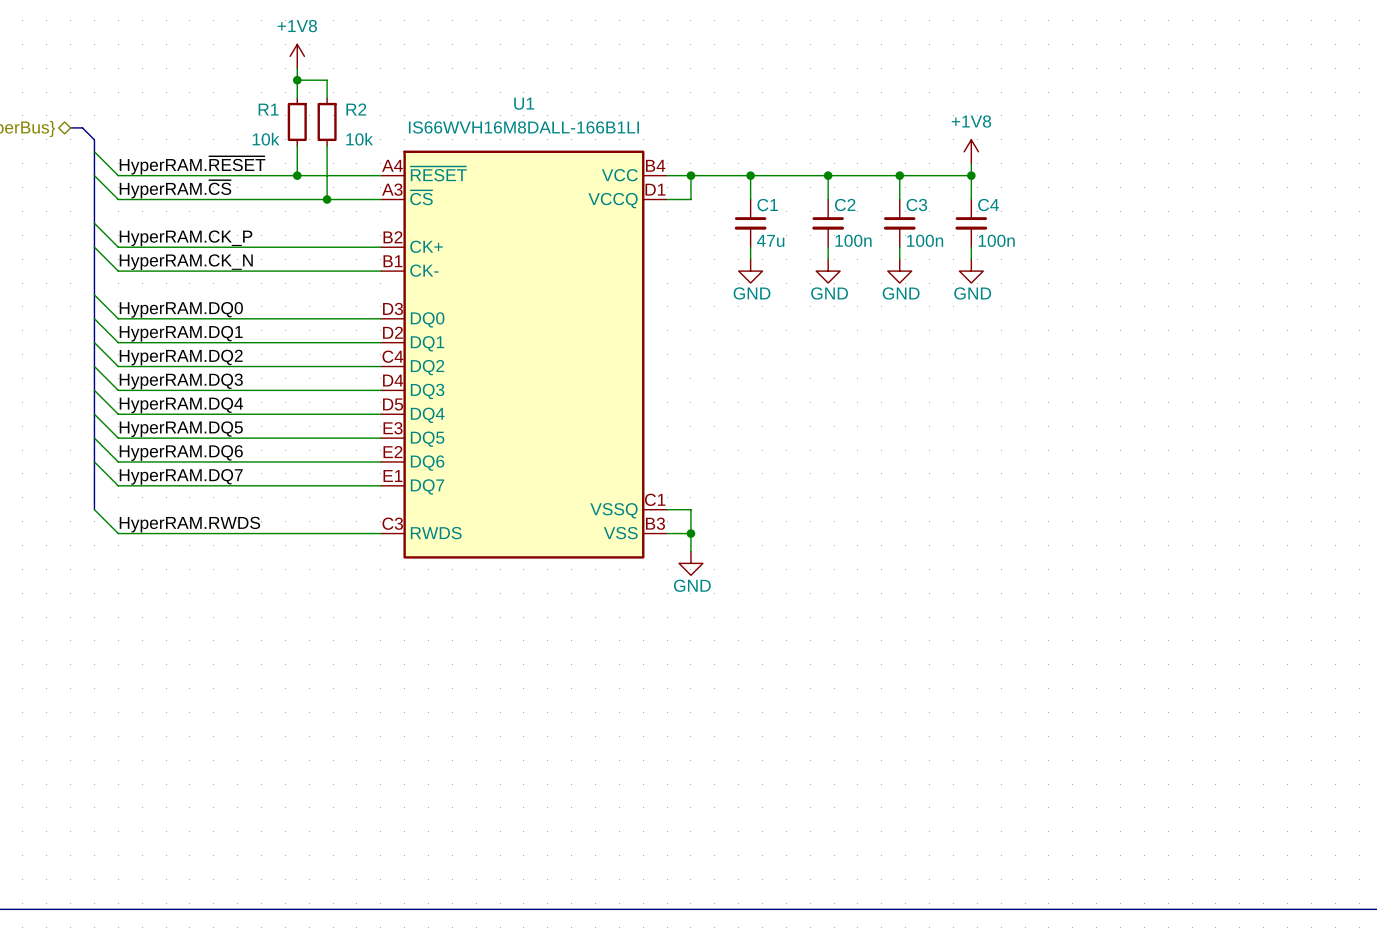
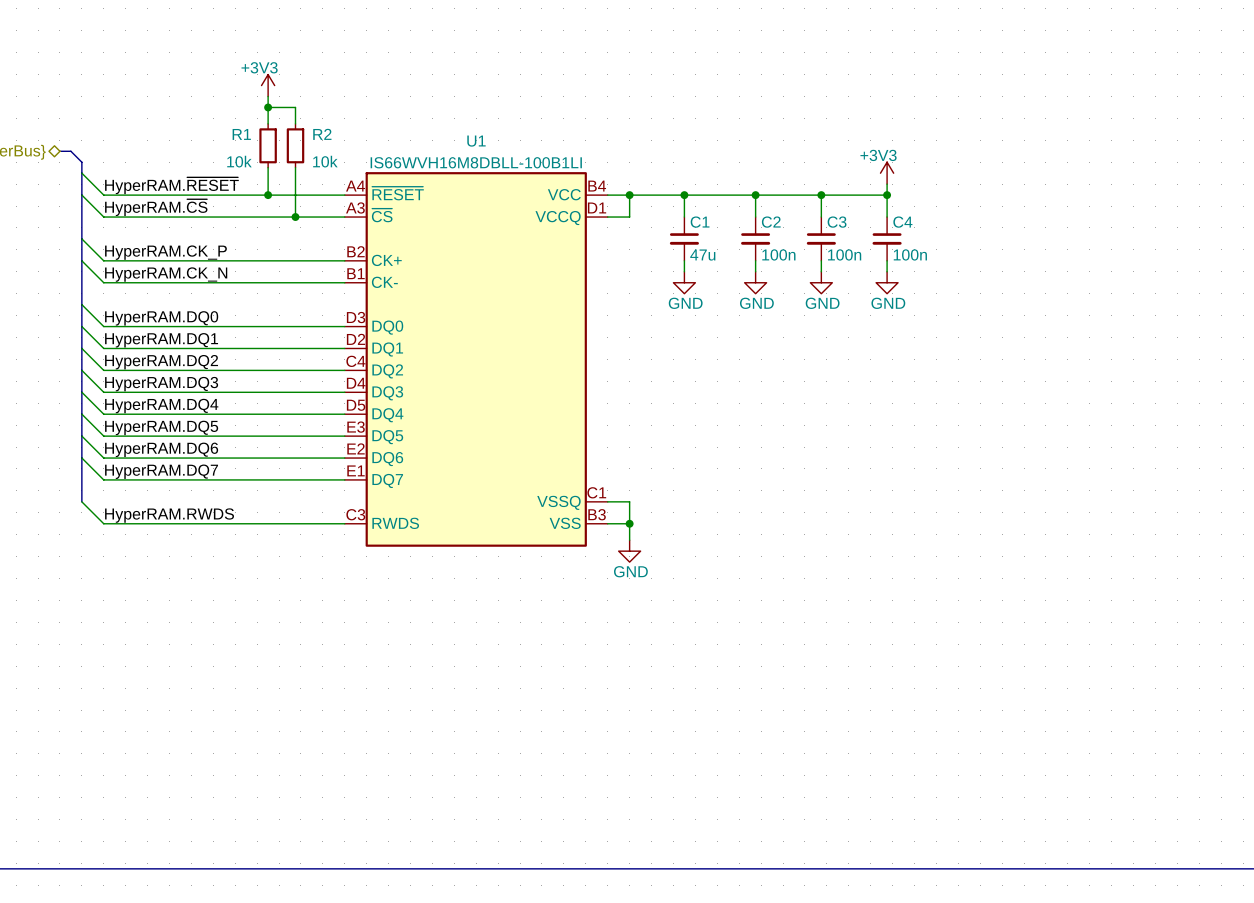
power symbol: +1V8 (297, 56) -> +3V3 (268, 85)
U1 text: IS66WVH16M8DALL-166B1LI (523, 127) -> IS66WVH16M8DBLL-100B1LI (476, 162)
U1 symbol: [380, 150, 668, 559] -> [344, 172, 608, 547]
power symbol: +1V8 (971, 151) -> +3V3 (887, 173)

